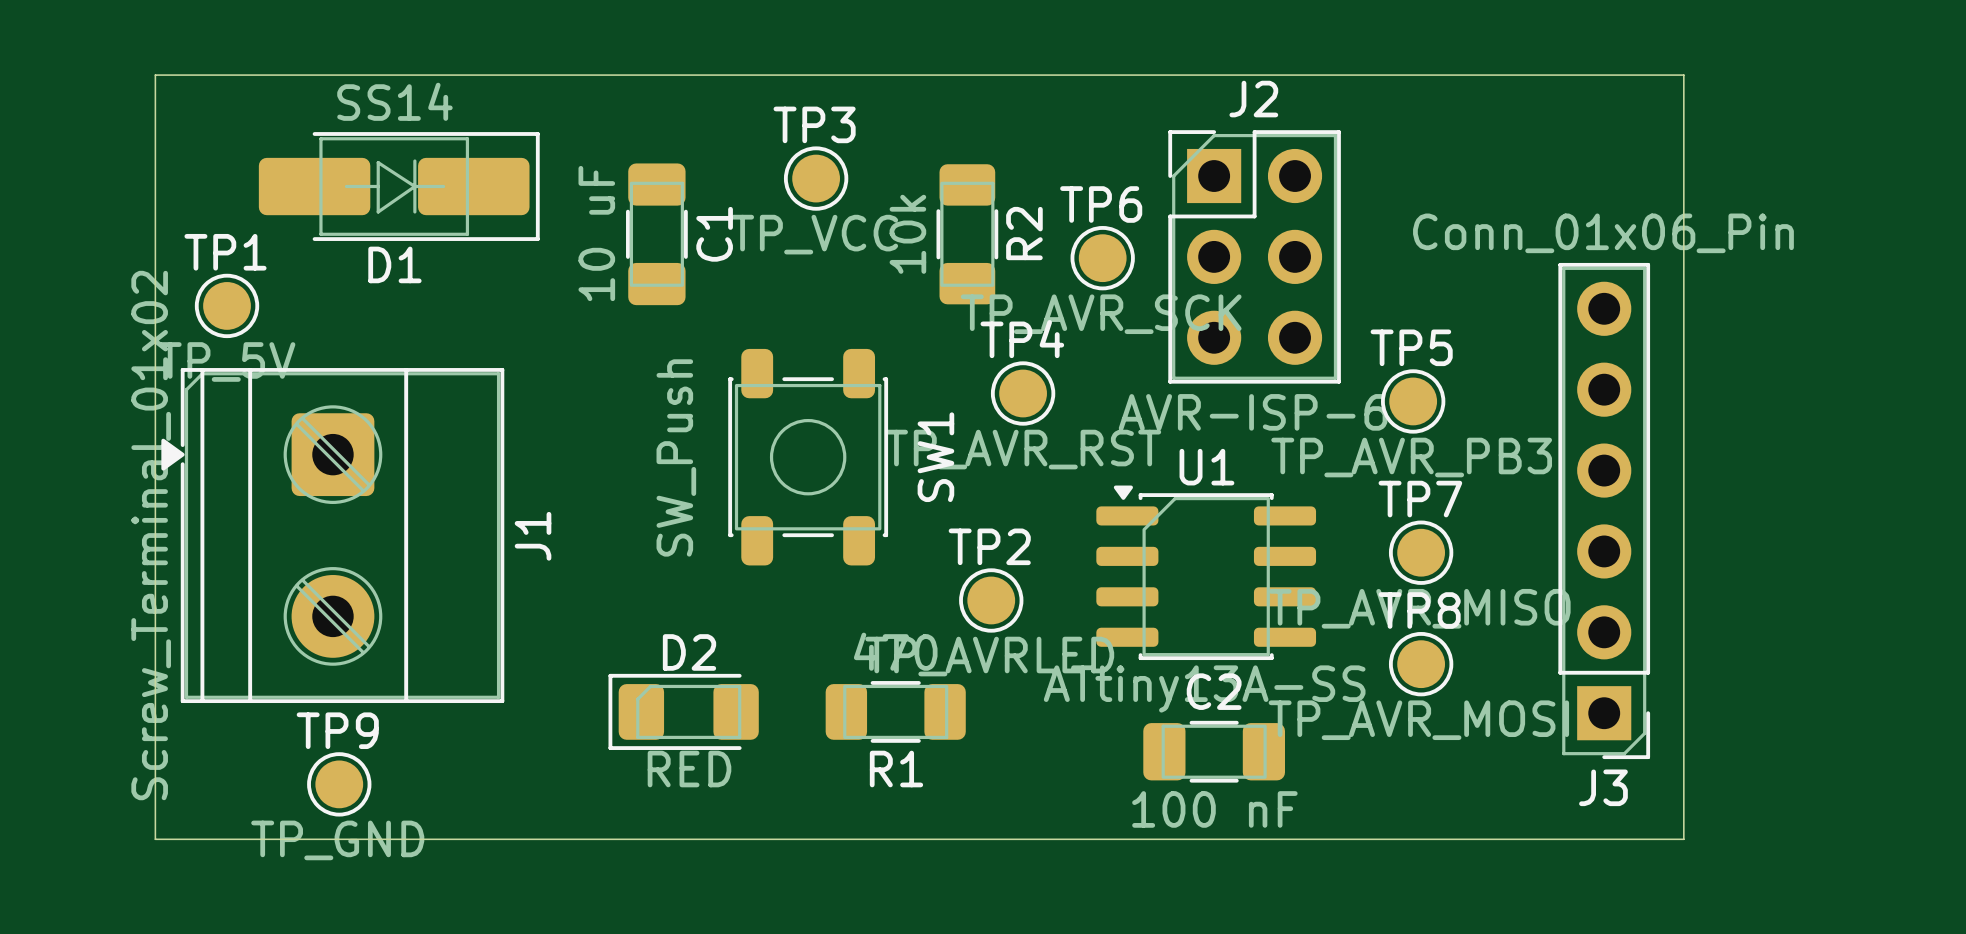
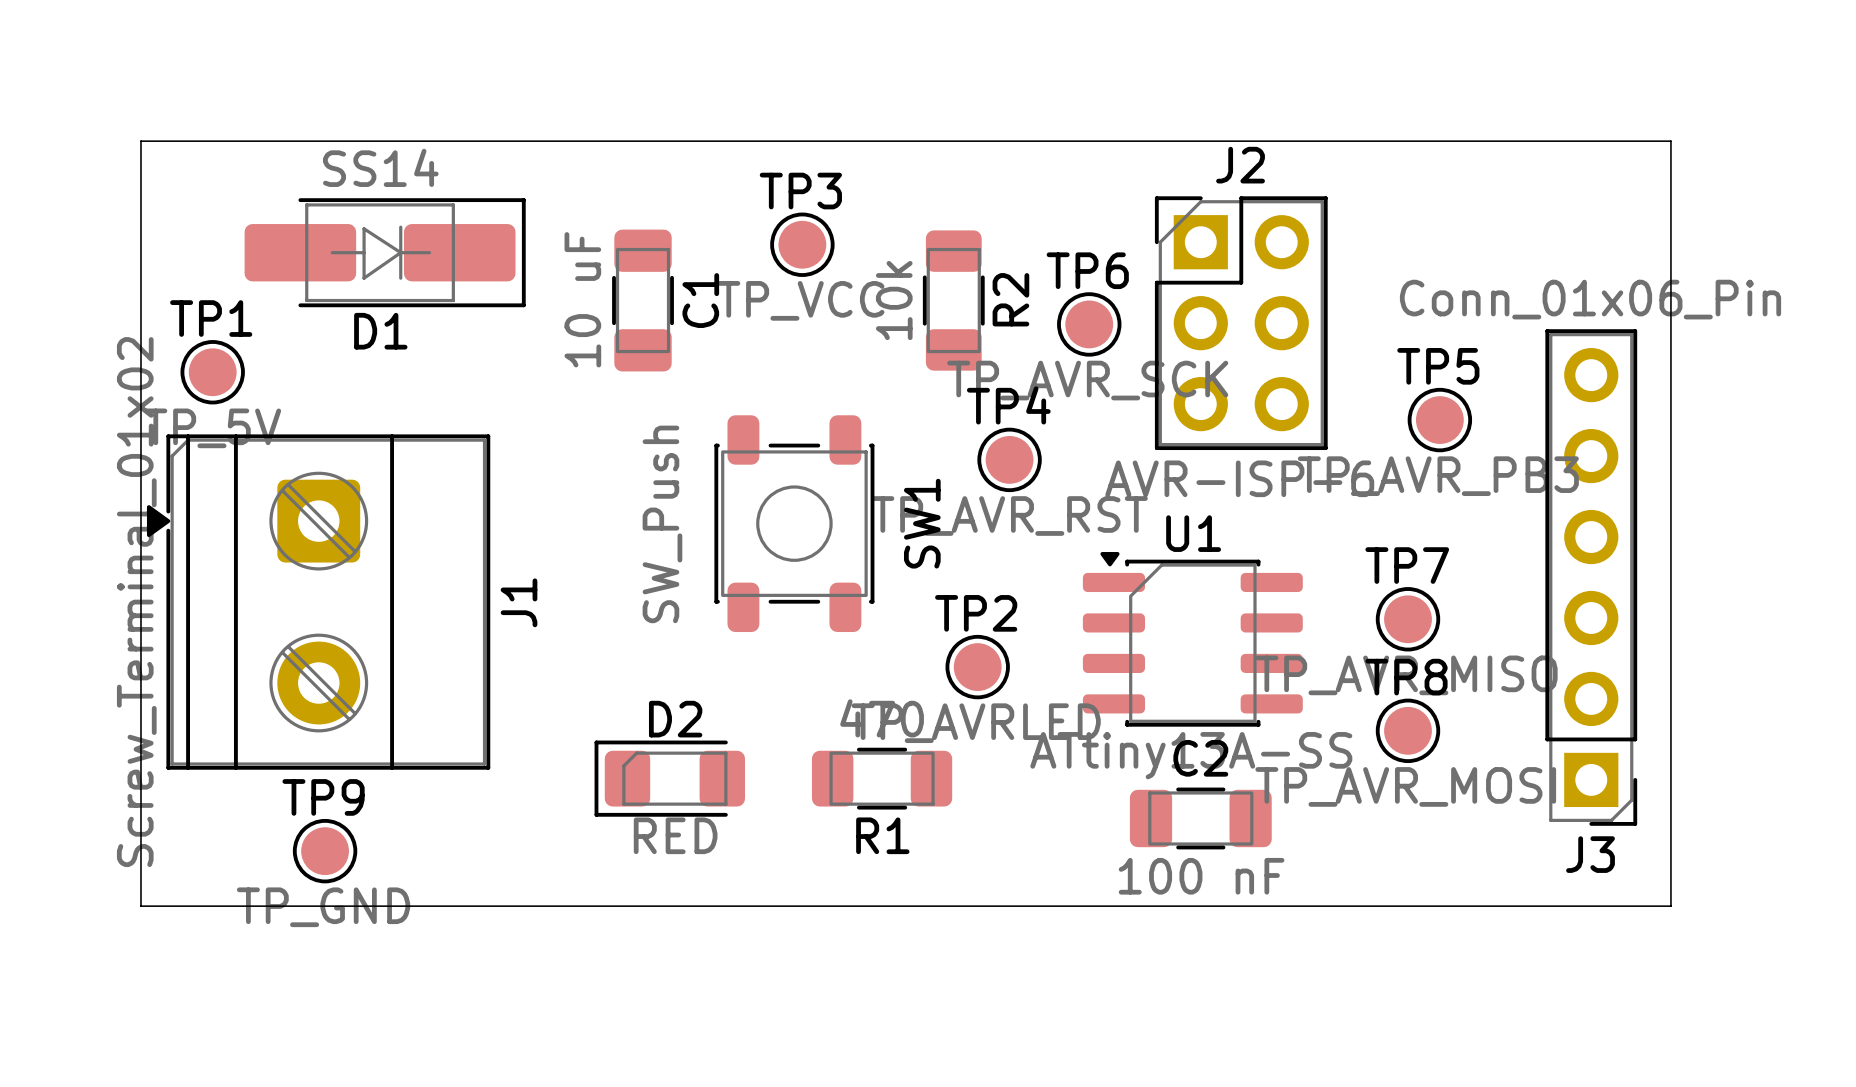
TP5 position: (1413, 401) -> (1439, 420)

